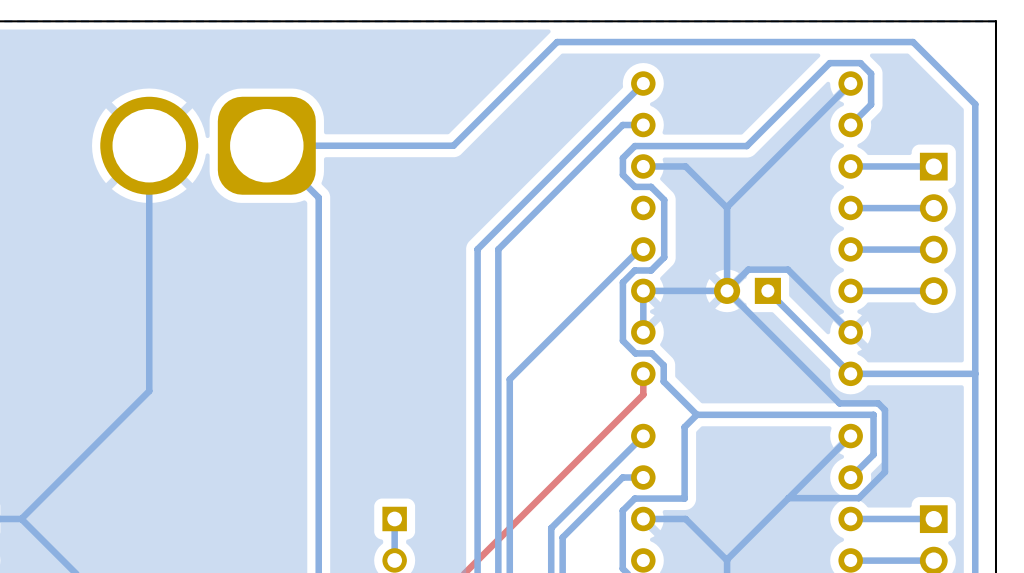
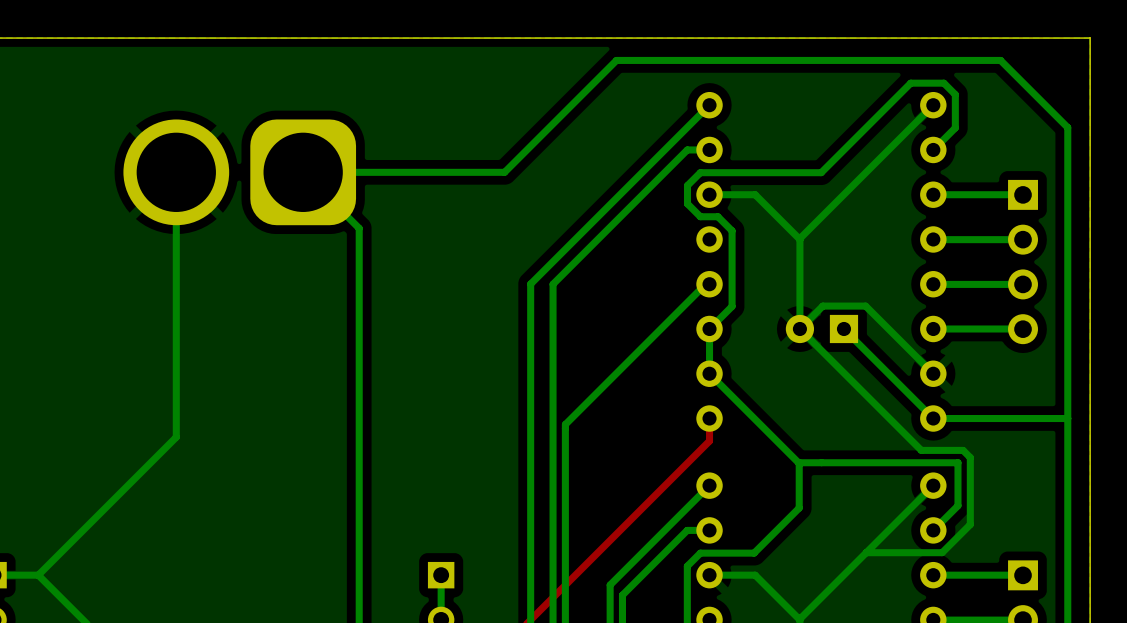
bottom track: (664, 257) (651, 270) (634, 270) (622, 282) (622, 340) (635, 353) (651, 353) (663, 365) (663, 381) (696, 414) -> none
bottom track: (727, 290) (643, 290) -> (732, 292) (732, 306) (709, 328)
bottom track: (696, 414) (684, 427) (684, 498) -> (799, 462) (799, 508) (754, 553)
bottom track: (725, 414) (696, 414) -> (798, 462) (709, 373)

